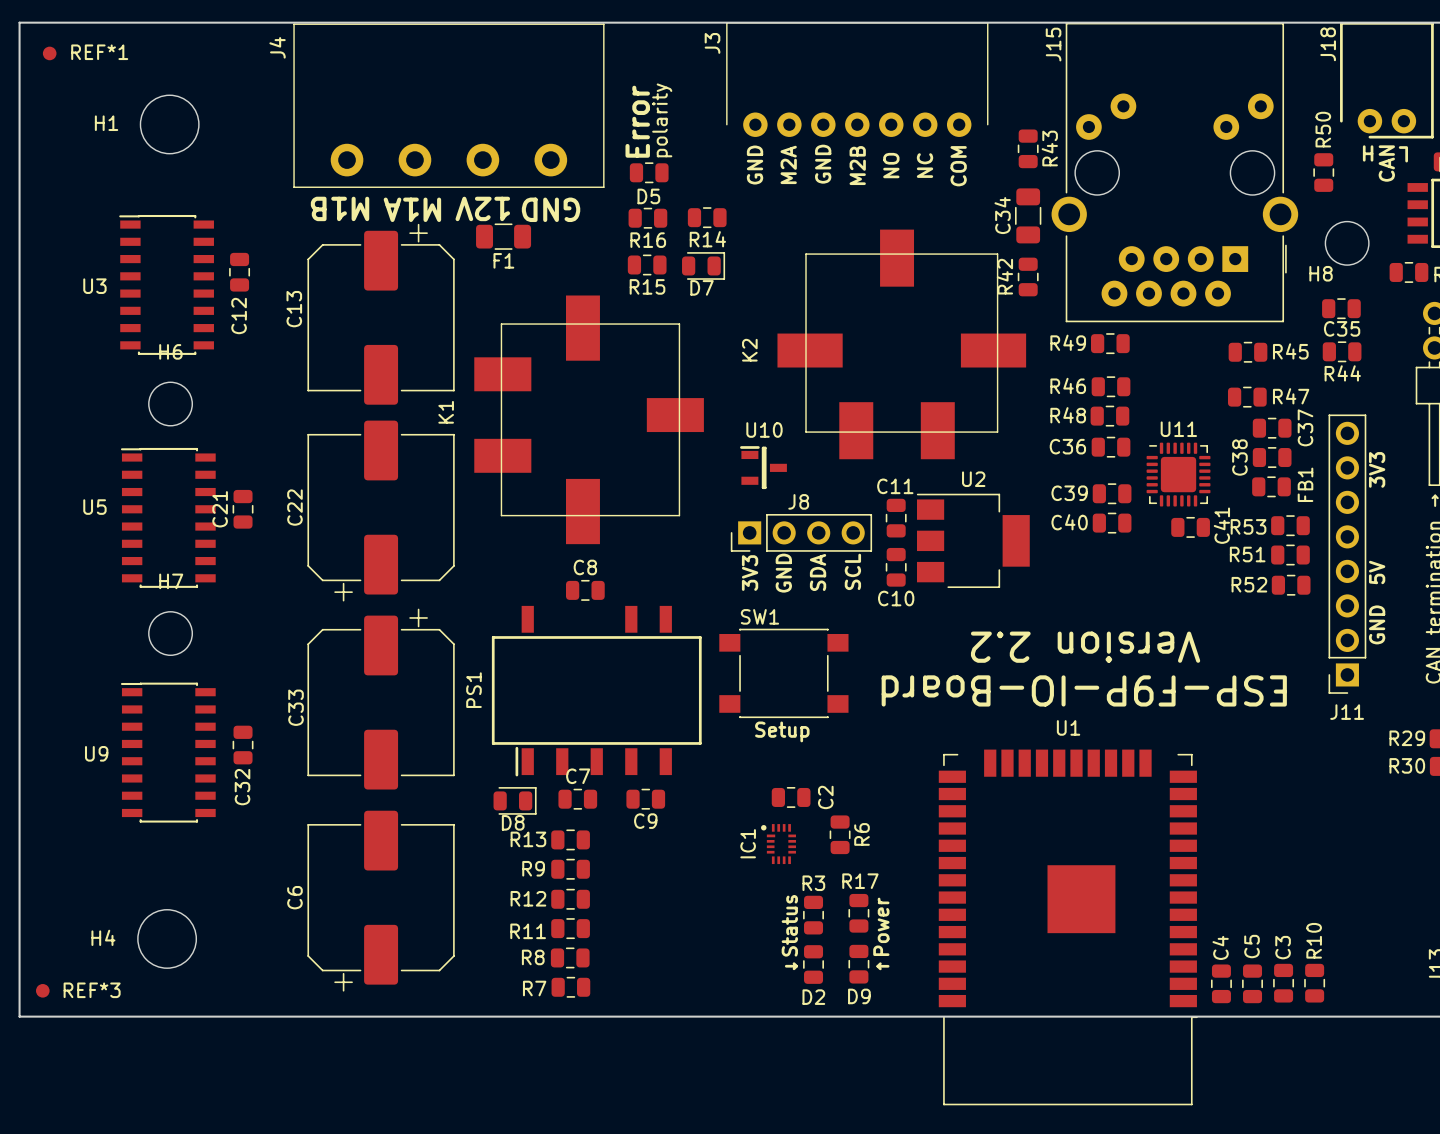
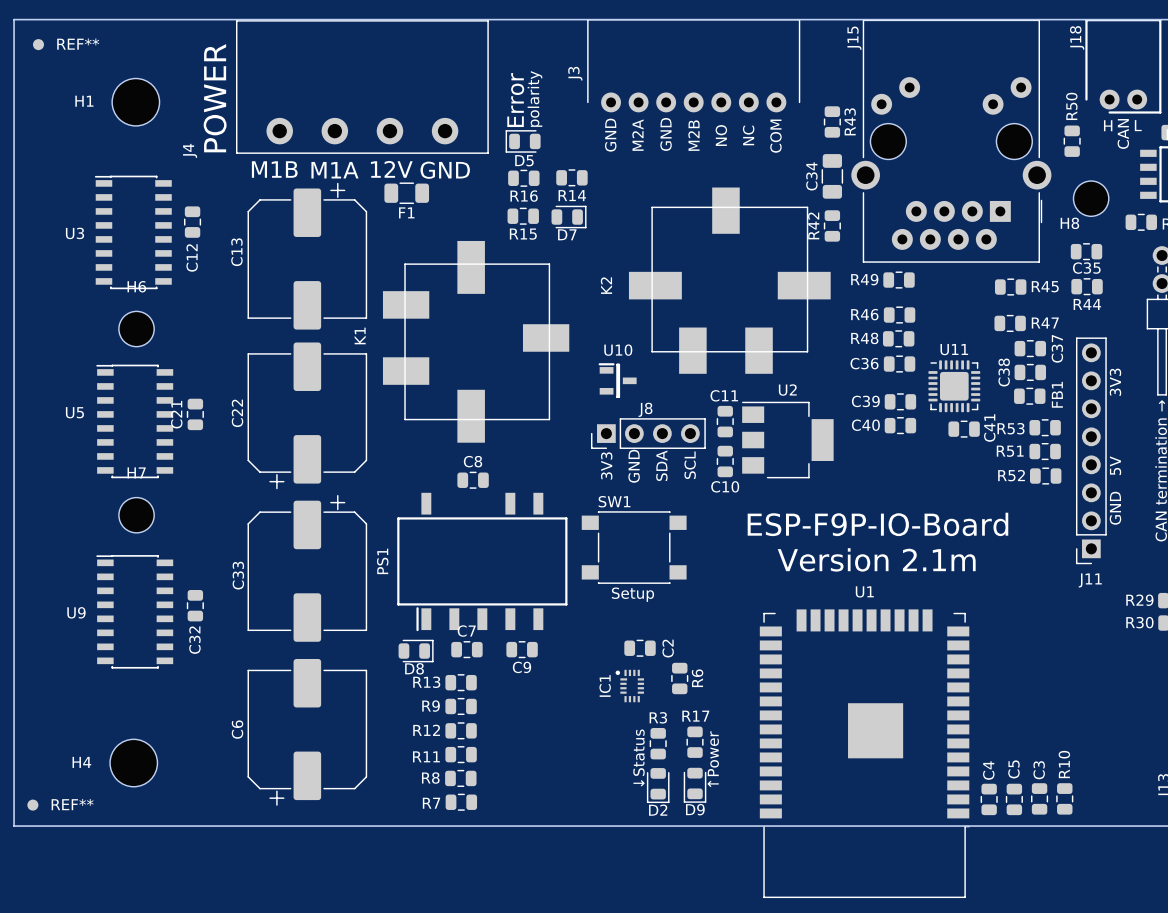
J3 name position: J3 (712, 43) -> J3 (575, 73)
J4 name position: J4 (277, 47) -> J4 (190, 150)
REF*1 name: REF*1 (99, 52) -> REF** (78, 44)
text: none -> POWER (215, 98)
text rotation: 0° (1403, 154) -> 180° (1138, 125)
D5 footprint: [629, 162, 669, 184] -> [505, 130, 541, 153]
text rotation: 0° (340, 208) -> 180° (274, 169)
text rotation: 0° (482, 208) -> 180° (391, 169)
text rotation: 0° (412, 209) -> 180° (334, 170)
text rotation: 0° (551, 209) -> 180° (445, 170)
text: Version 2.2 (1085, 647) -> ESP-F9P-IO-Board (877, 524)
text: ESP-F9P-IO-Board (1084, 690) -> Version 2.1m (876, 559)
D9 footprint: [848, 944, 870, 984] -> [683, 767, 707, 803]
D2 footprint: [803, 945, 824, 984] -> [646, 768, 670, 803]
REF*3 name: REF*3 (92, 990) -> REF** (72, 804)

